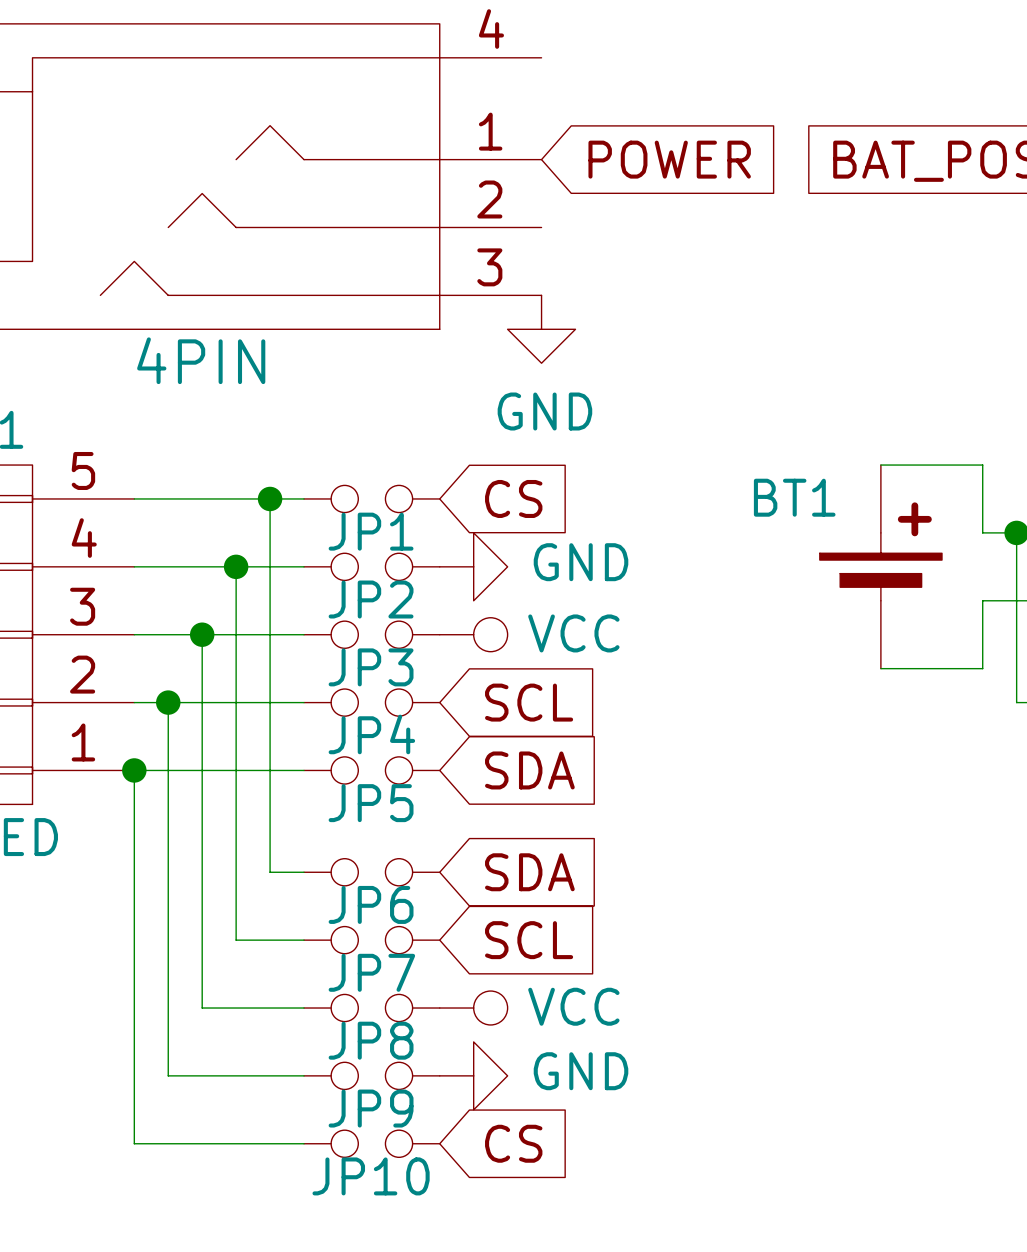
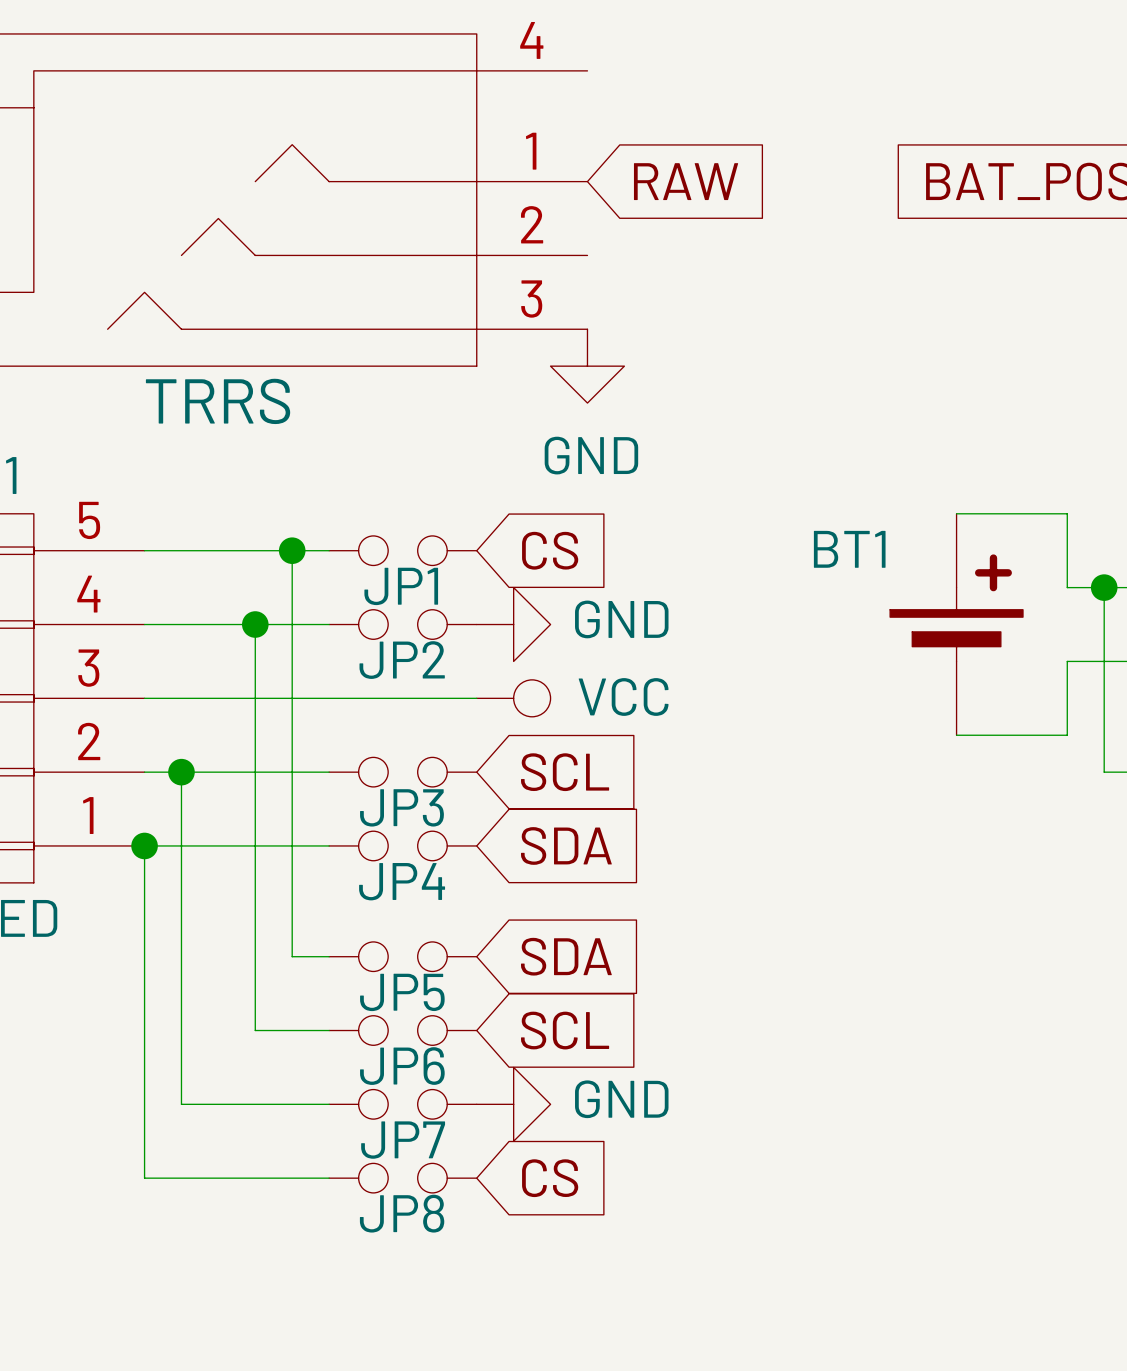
global label: POWER (669, 159) -> RAW (686, 181)
part value: 4PIN (201, 360) -> TRRS (218, 401)
wire: (202, 634) (202, 1008) -> none
junction: (202, 634) -> none
wire: none -> (329, 698) (476, 698)
JP3: (371, 634) -> none
JP4 name: JP4 (371, 734) -> JP3 (401, 807)
JP5 name: JP5 (371, 803) -> JP4 (402, 881)
JP6 name: JP6 (371, 904) -> JP5 (402, 992)
JP7 name: JP7 (371, 972) -> JP6 (402, 1066)
wire: (168, 1008) (168, 1075) -> (181, 1104) (218, 1104)
power symbol: VCC (473, 1008) -> GND (513, 1104)
JP8 name: JP8 (371, 1040) -> JP7 (403, 1140)
wire: (134, 1075) (134, 1143) (304, 1143) -> (144, 1178) (181, 1178)
power symbol: GND (473, 1075) -> none
JP9 name: JP9 (371, 1108) -> JP8 (402, 1213)
JP10: (371, 1143) -> none
global label position: CS (513, 1143) -> CS (550, 1178)

